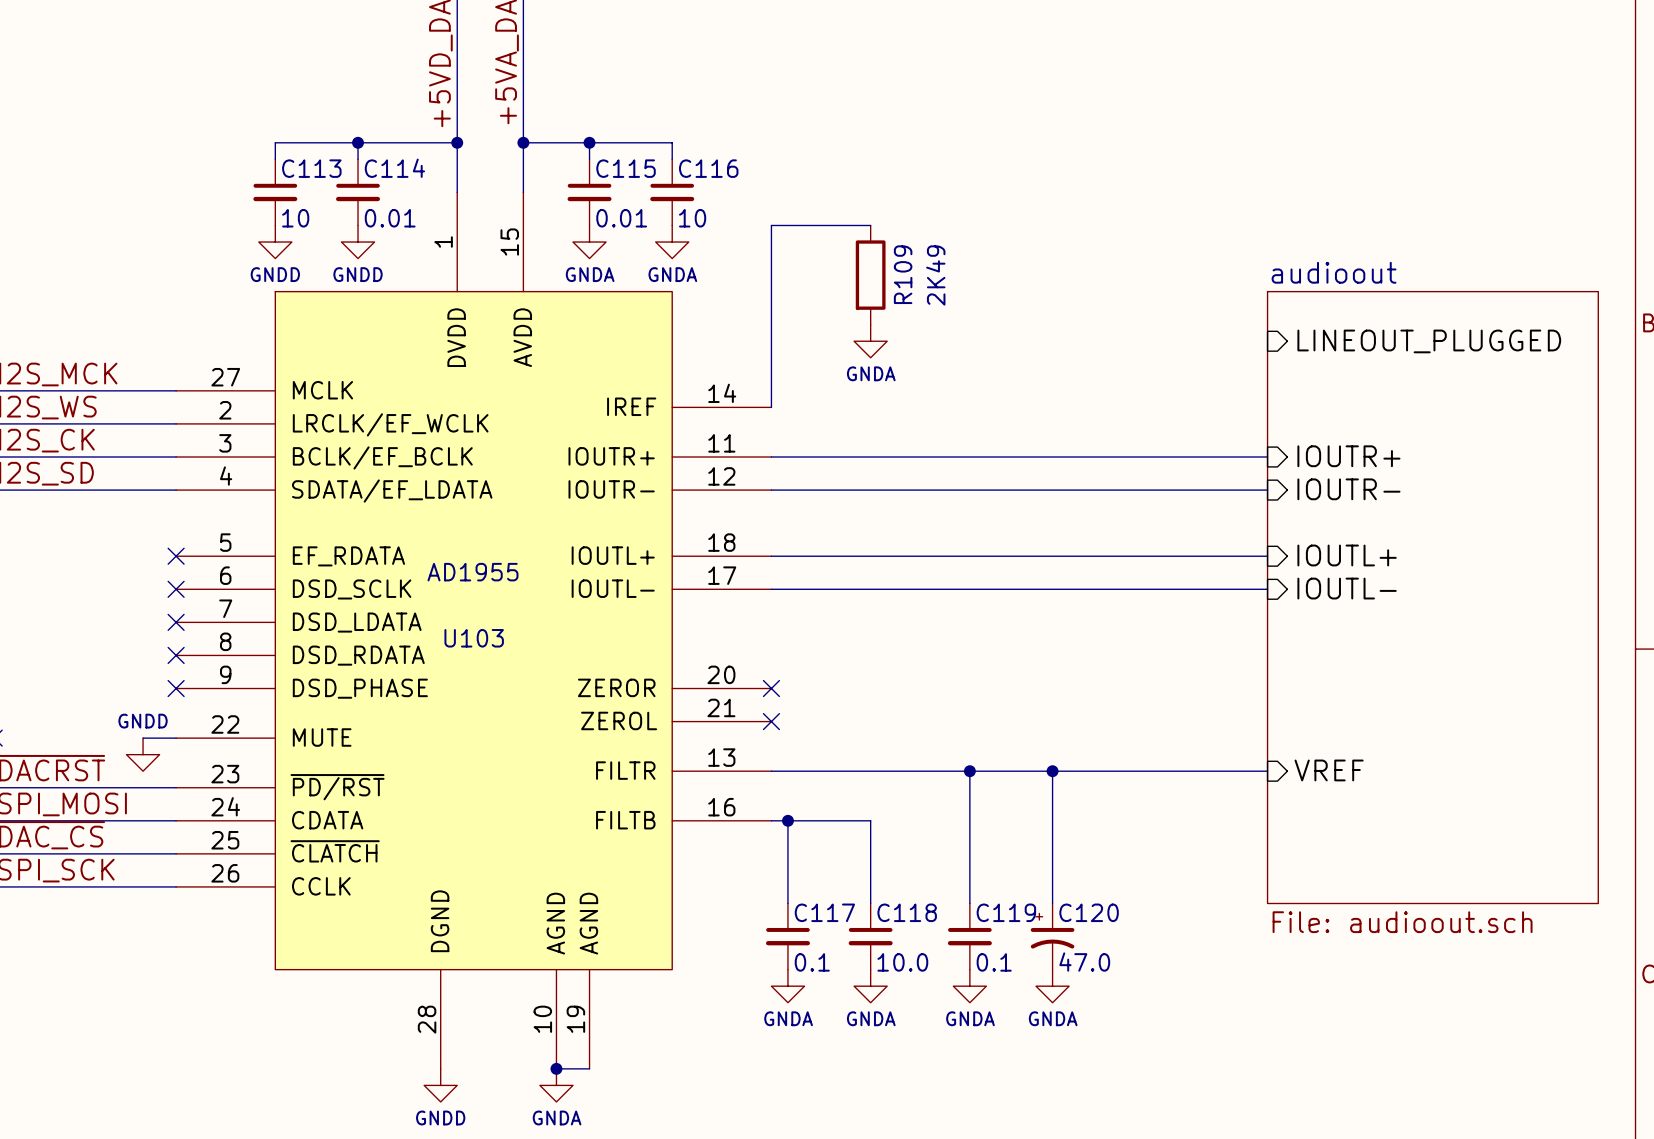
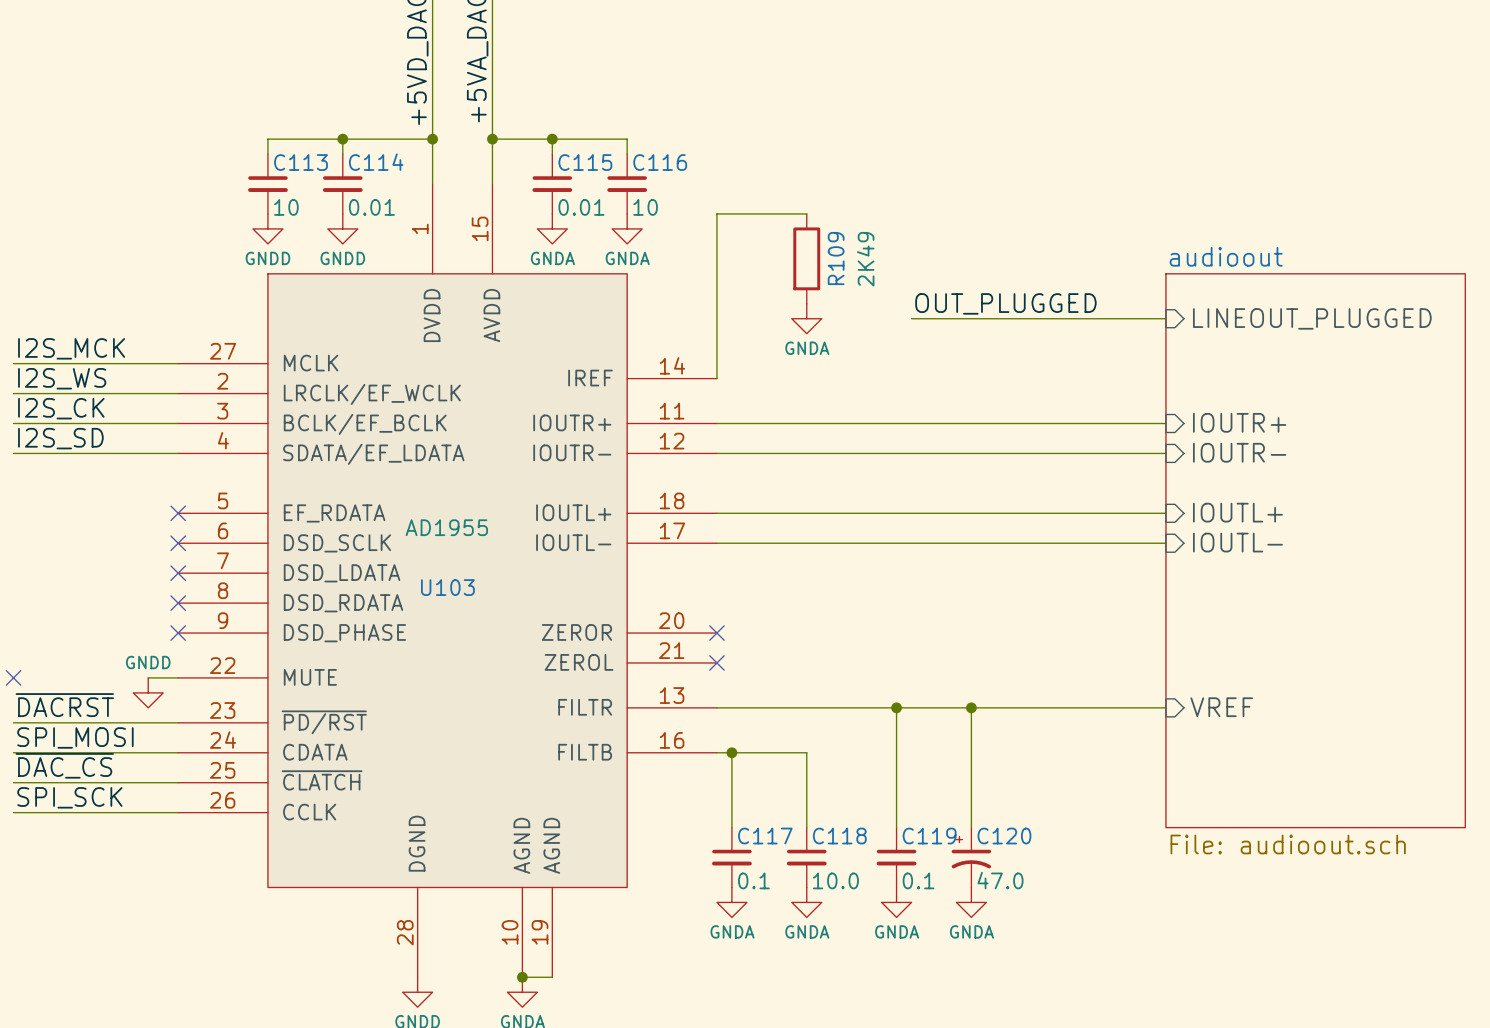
label: none -> OUT_PLUGGED (1005, 303)
wire: none -> (911, 318) (1165, 318)

